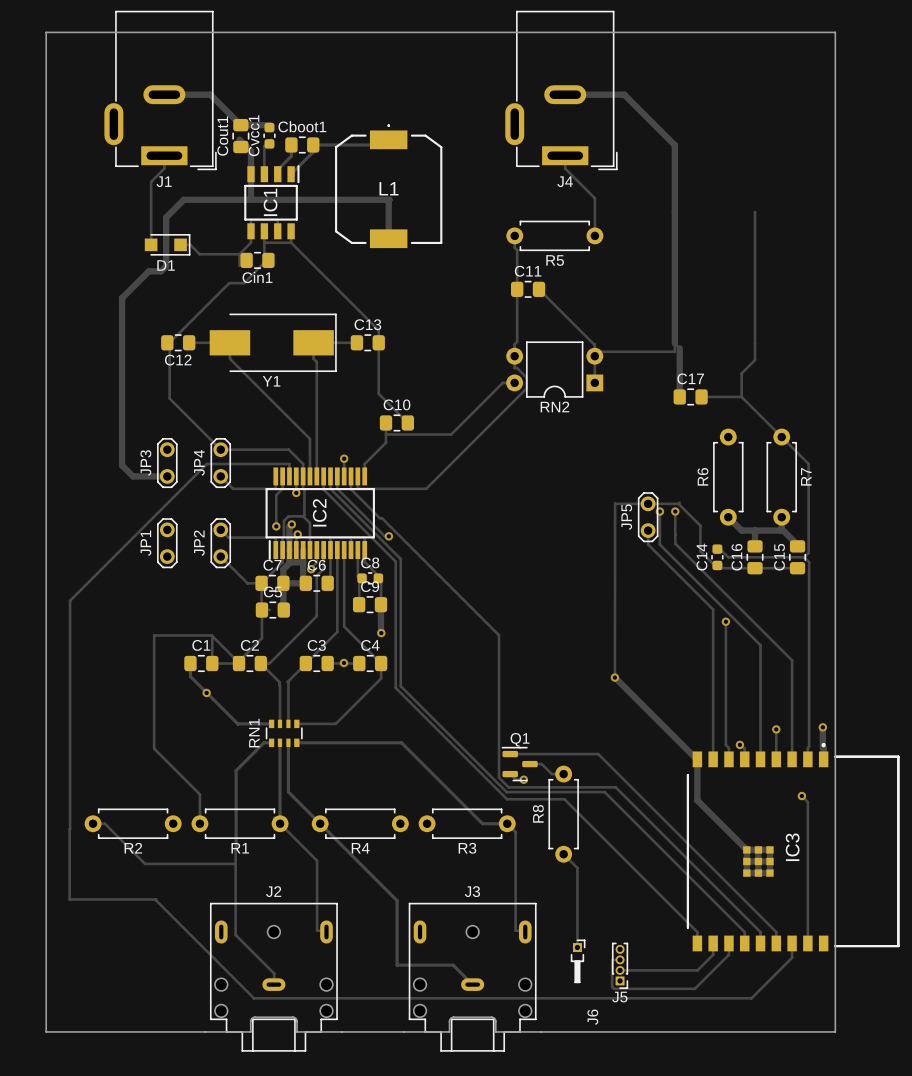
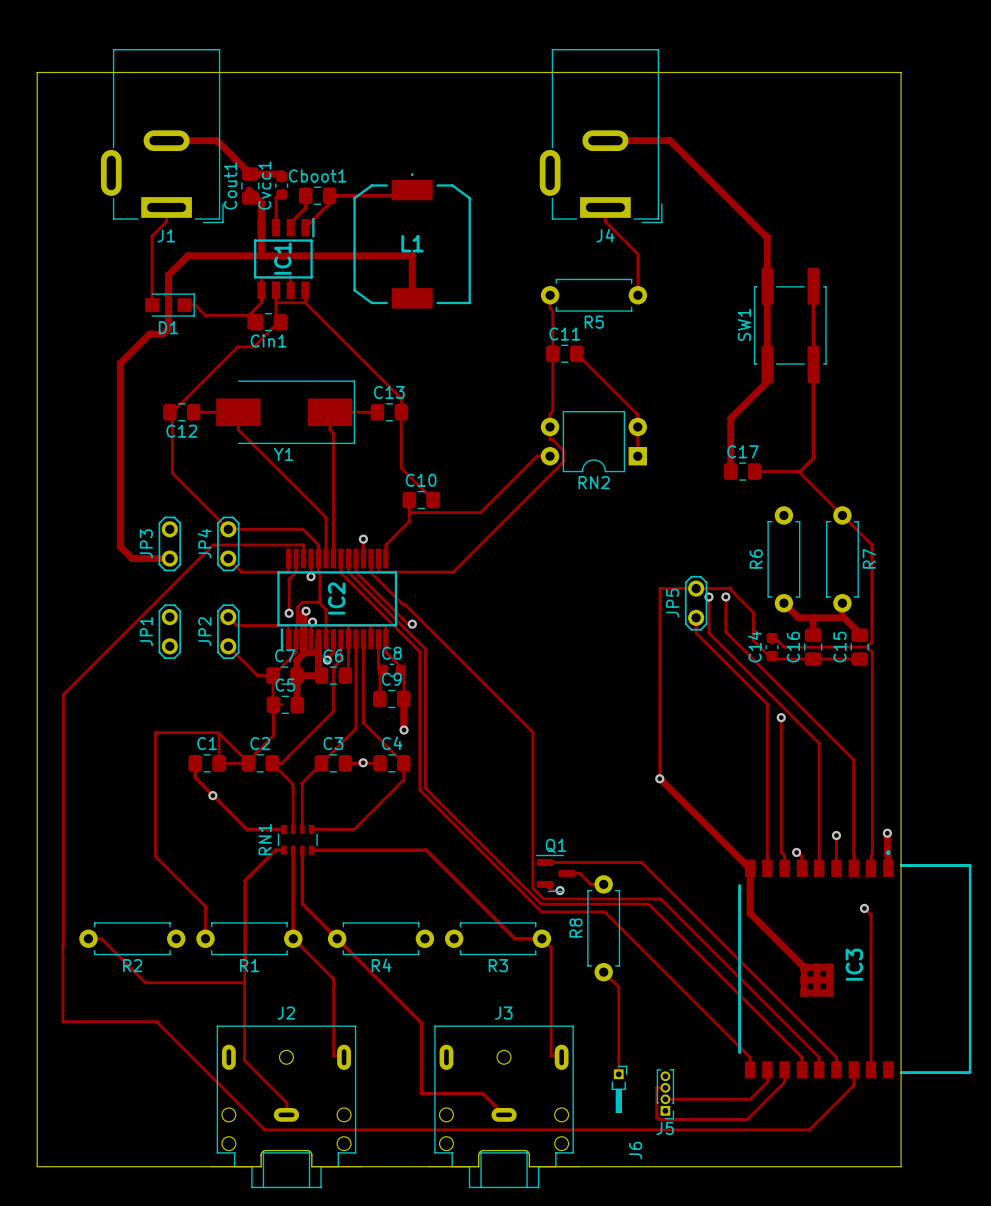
track: (674, 145) (674, 343) -> (725, 195) (767, 236) (767, 381) (730, 418)
track: (755, 211) (755, 360) (741, 373) (741, 396) -> none
track: none -> (813, 286) (813, 458) (799, 472)
SW1: none -> (790, 325)
track: (674, 343) (674, 351) (594, 351) -> none

